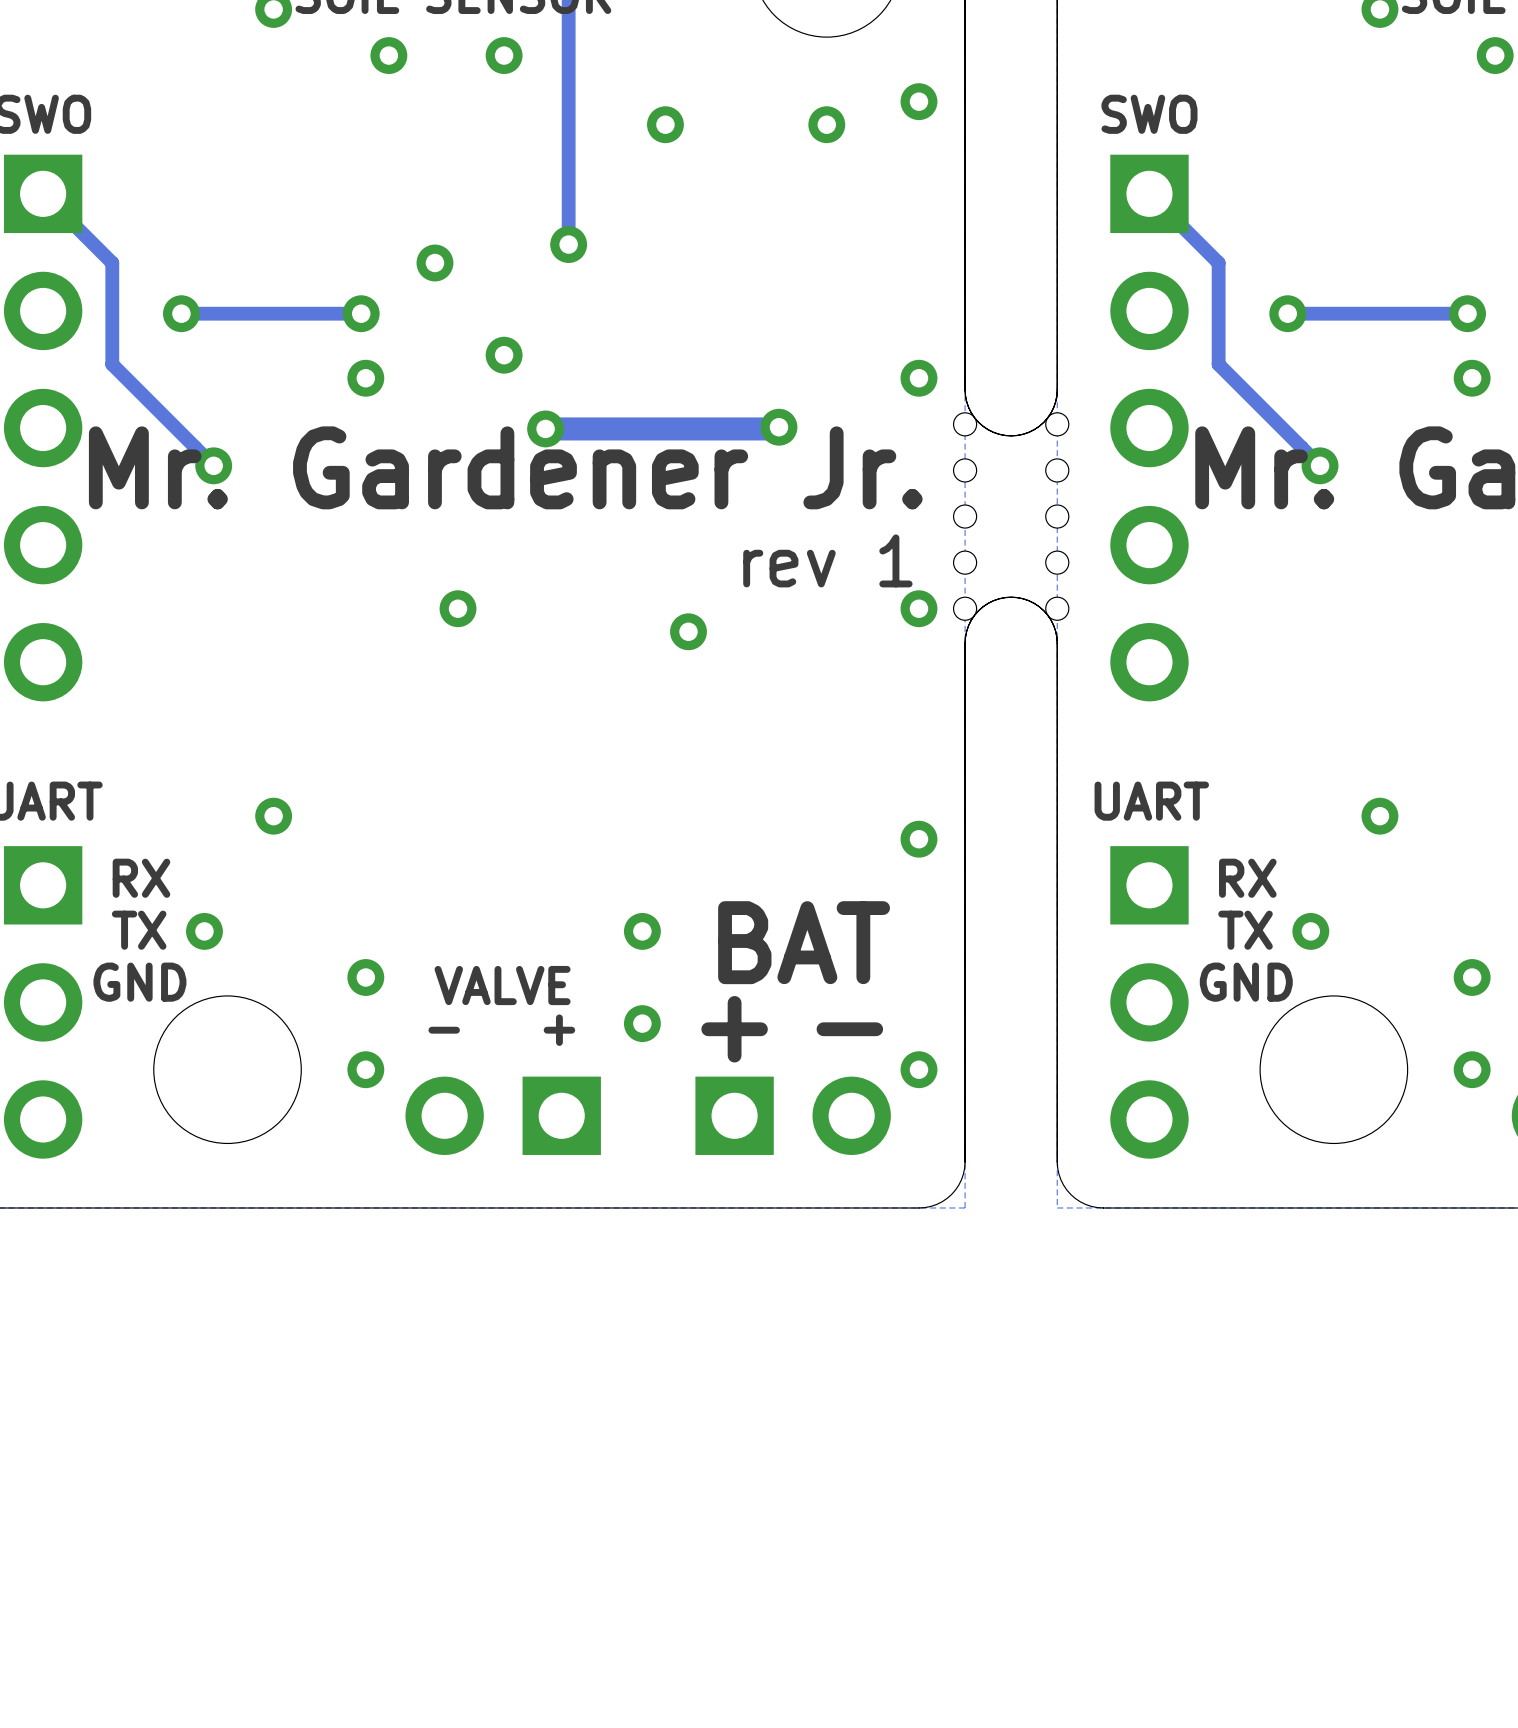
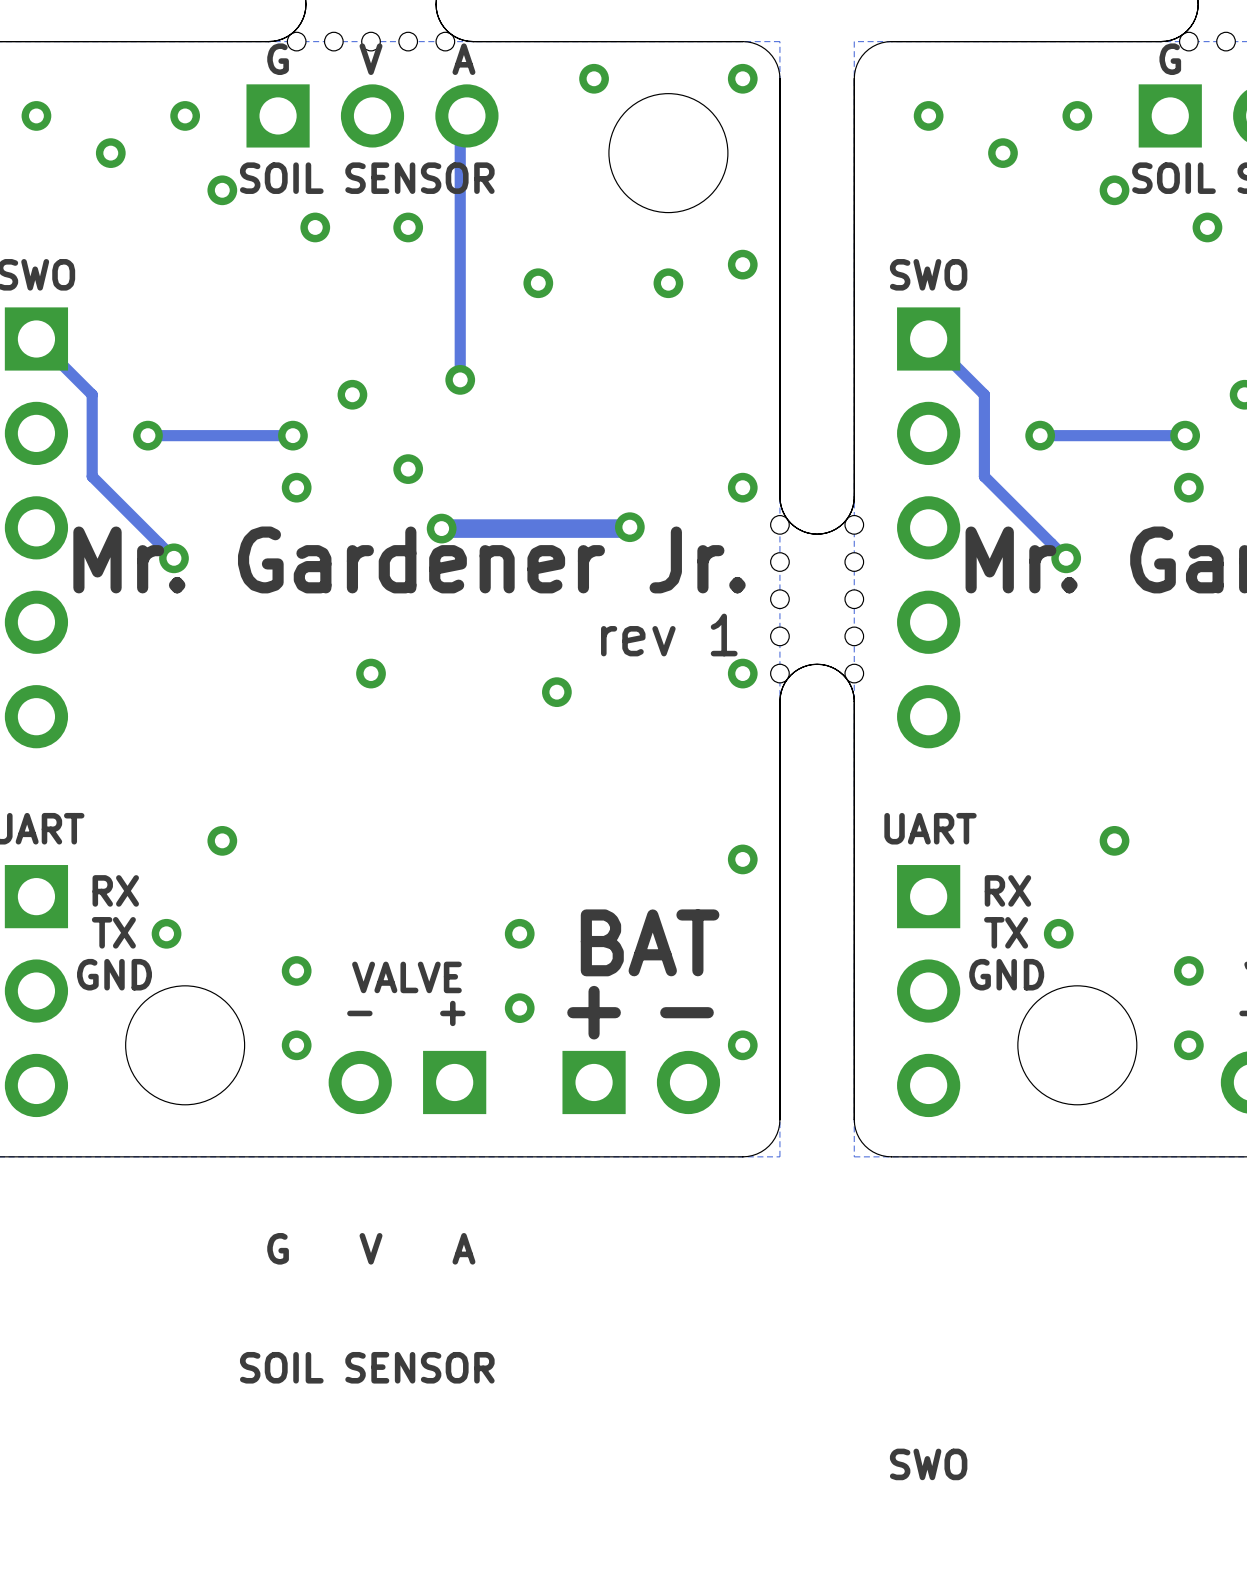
text: none -> G (278, 1248)
text: none -> V (371, 1248)
text: none -> A (463, 1248)
text: none -> SOIL SENSOR (367, 1367)
text: none -> SWO (928, 1464)

